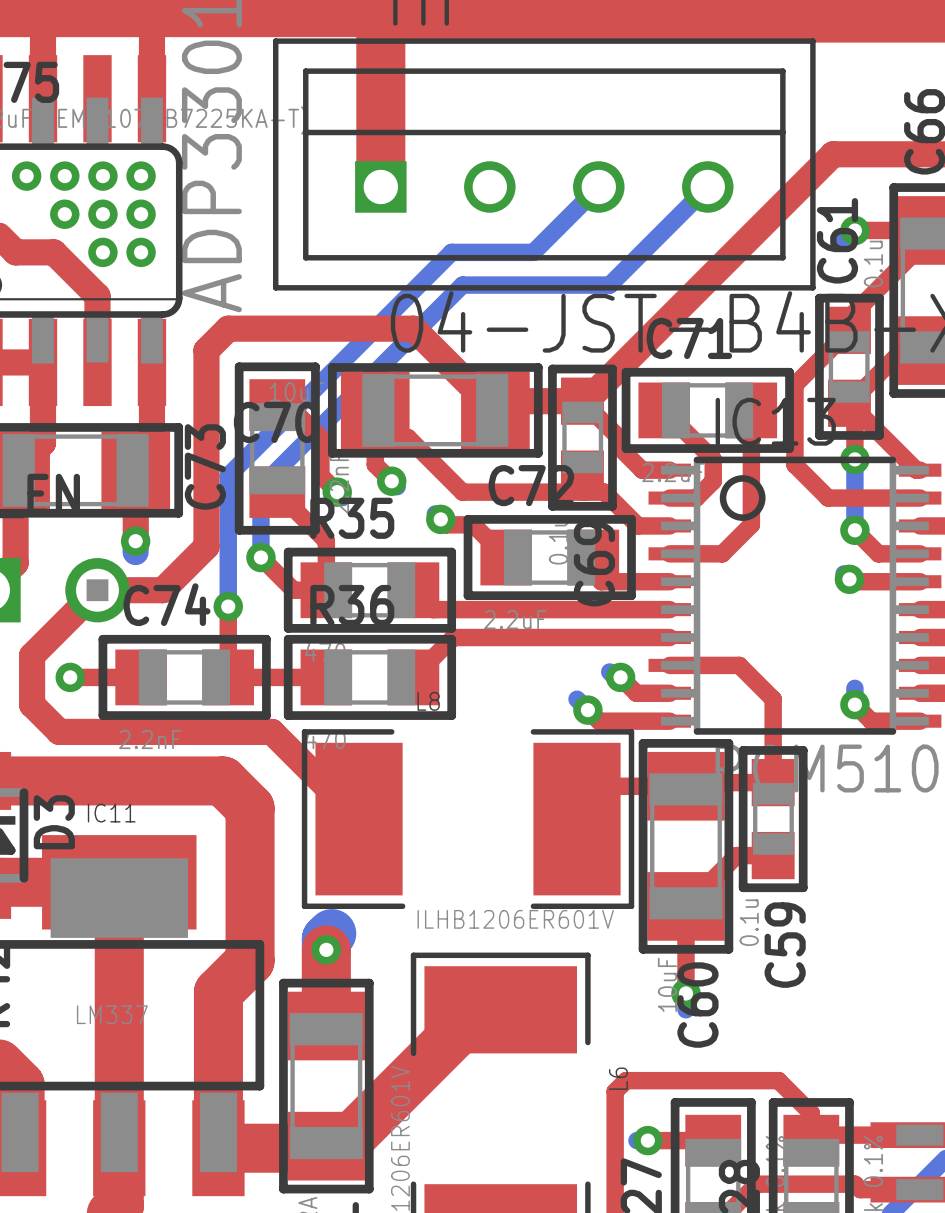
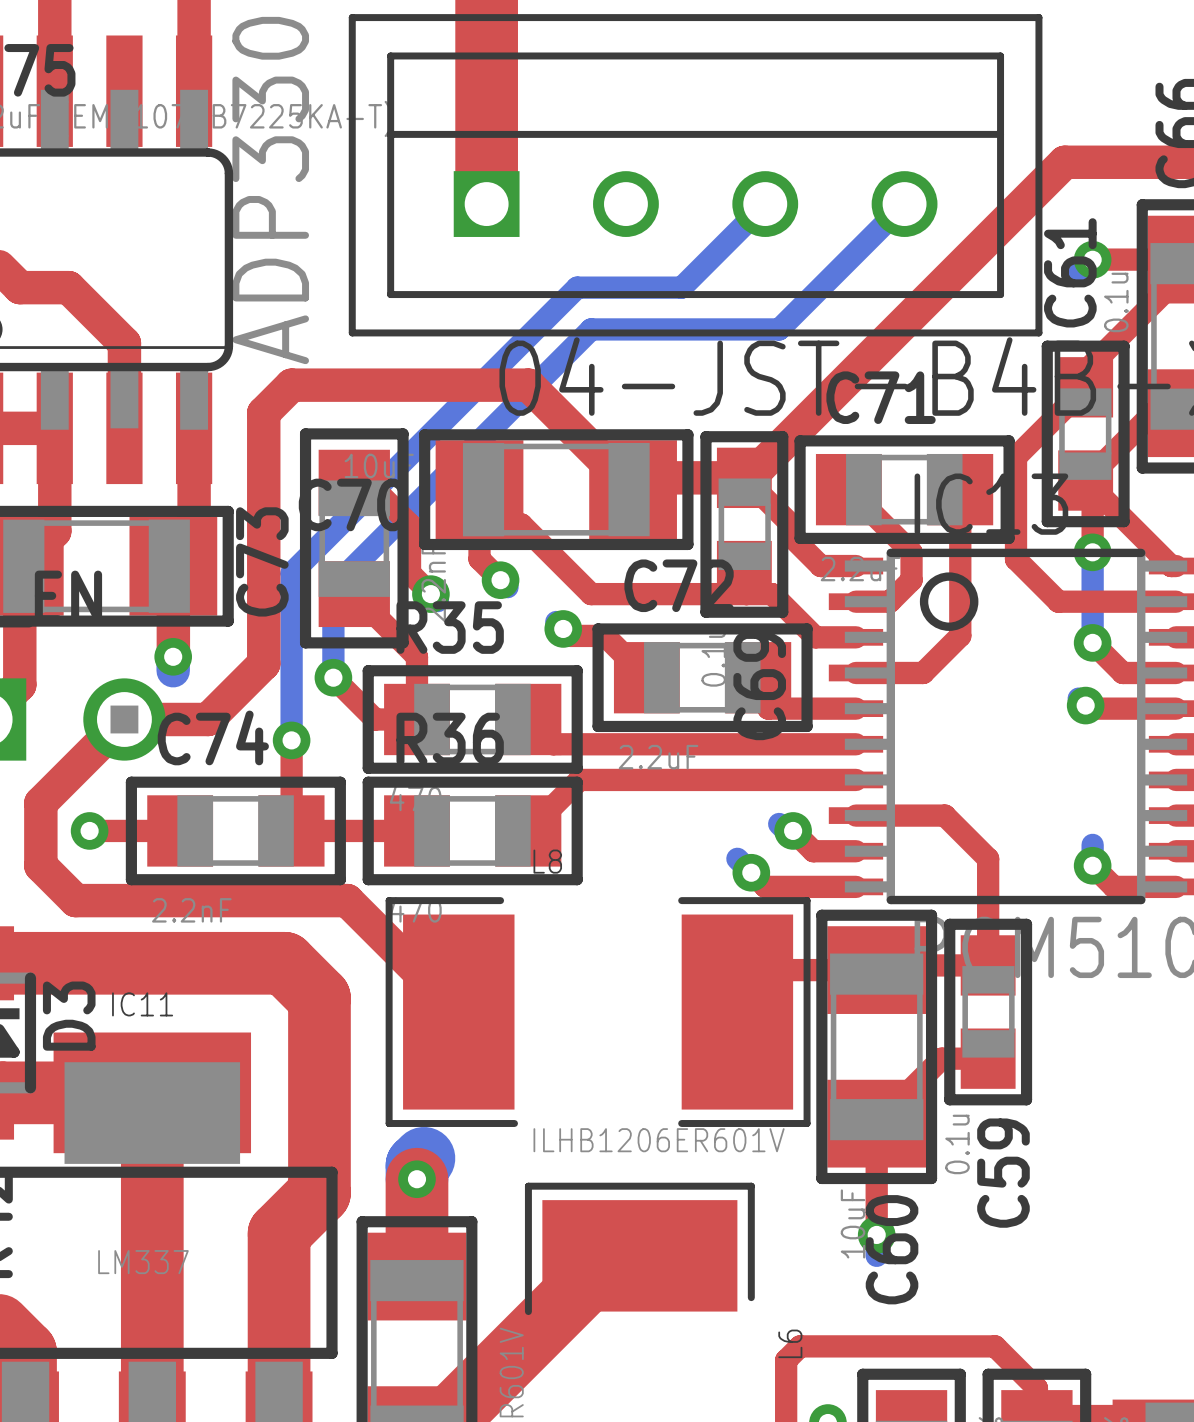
via: (26, 176) -> none
via: (64, 176) -> none
via: (102, 176) -> none
via: (141, 176) -> none
via: (64, 214) -> none
via: (102, 214) -> none
via: (141, 214) -> none
via: (102, 252) -> none
via: (141, 252) -> none

